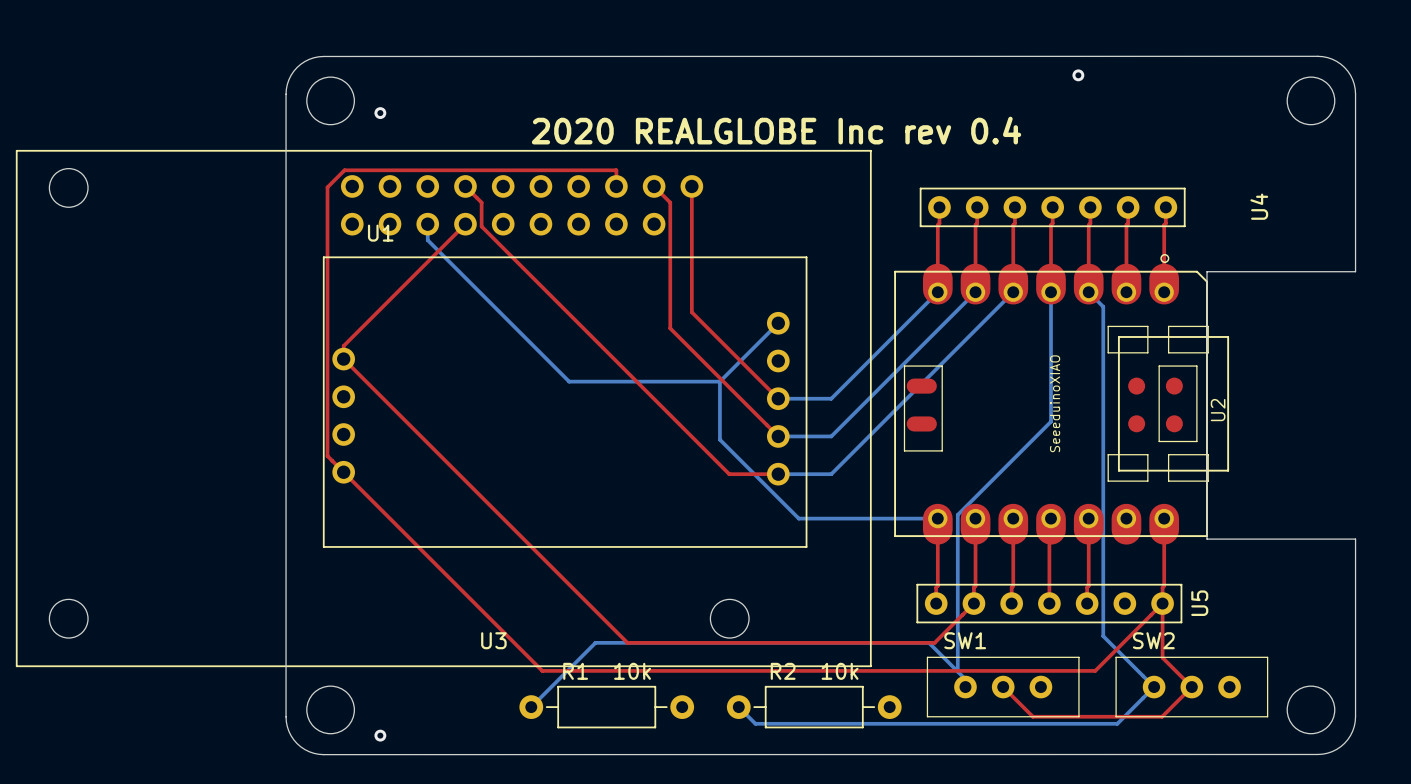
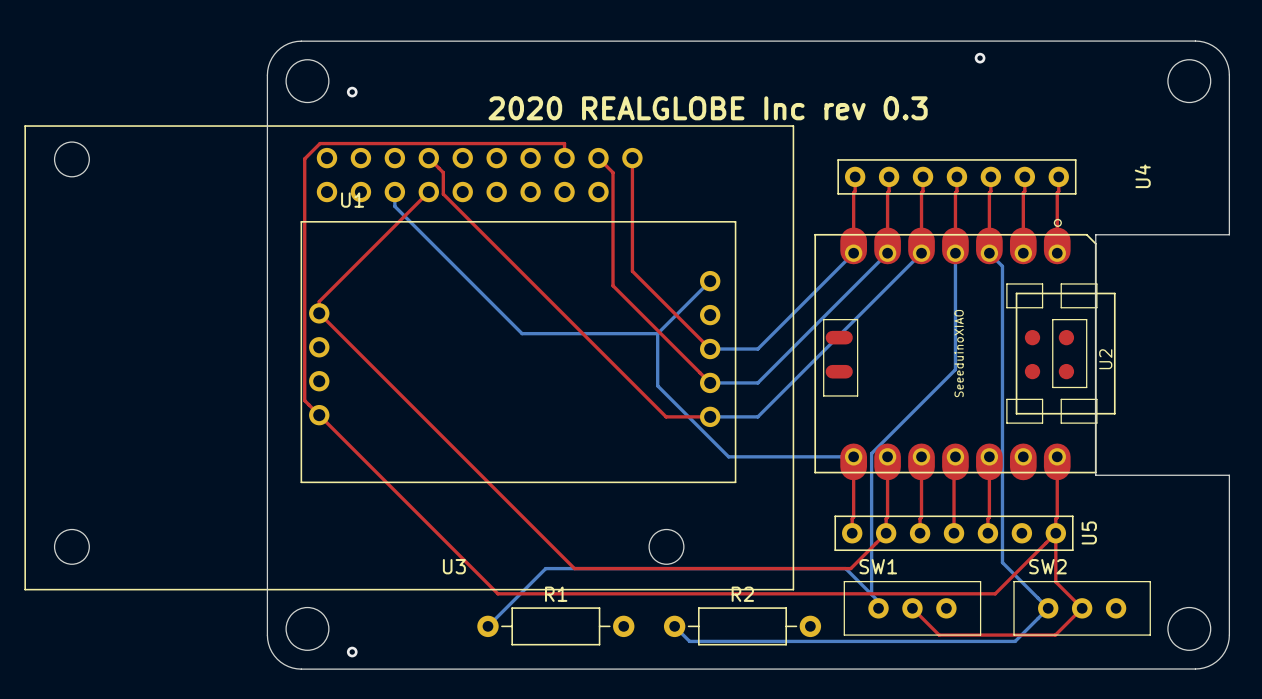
text: 2020 REALGLOBE Inc rev 0.4 (776, 130) -> 2020 REALGLOBE Inc rev 0.3 (708, 108)
R1 10k name: R1 10k (607, 671) -> R1 (556, 594)
R2 10k name: R2 10k (814, 671) -> R2 (742, 594)

